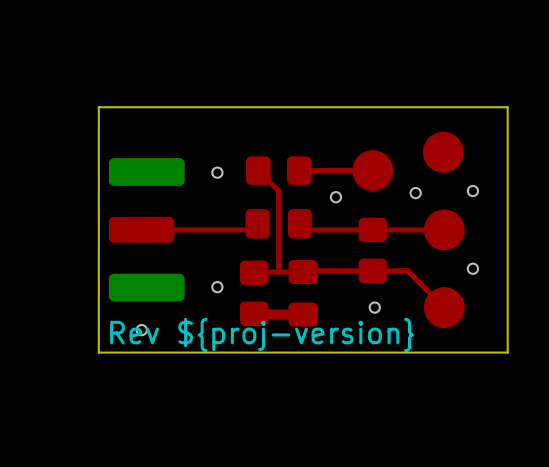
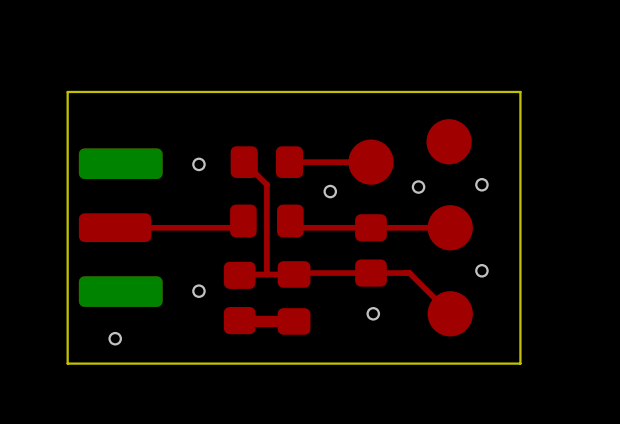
text: Rev ${proj-version} (262, 334) -> none

